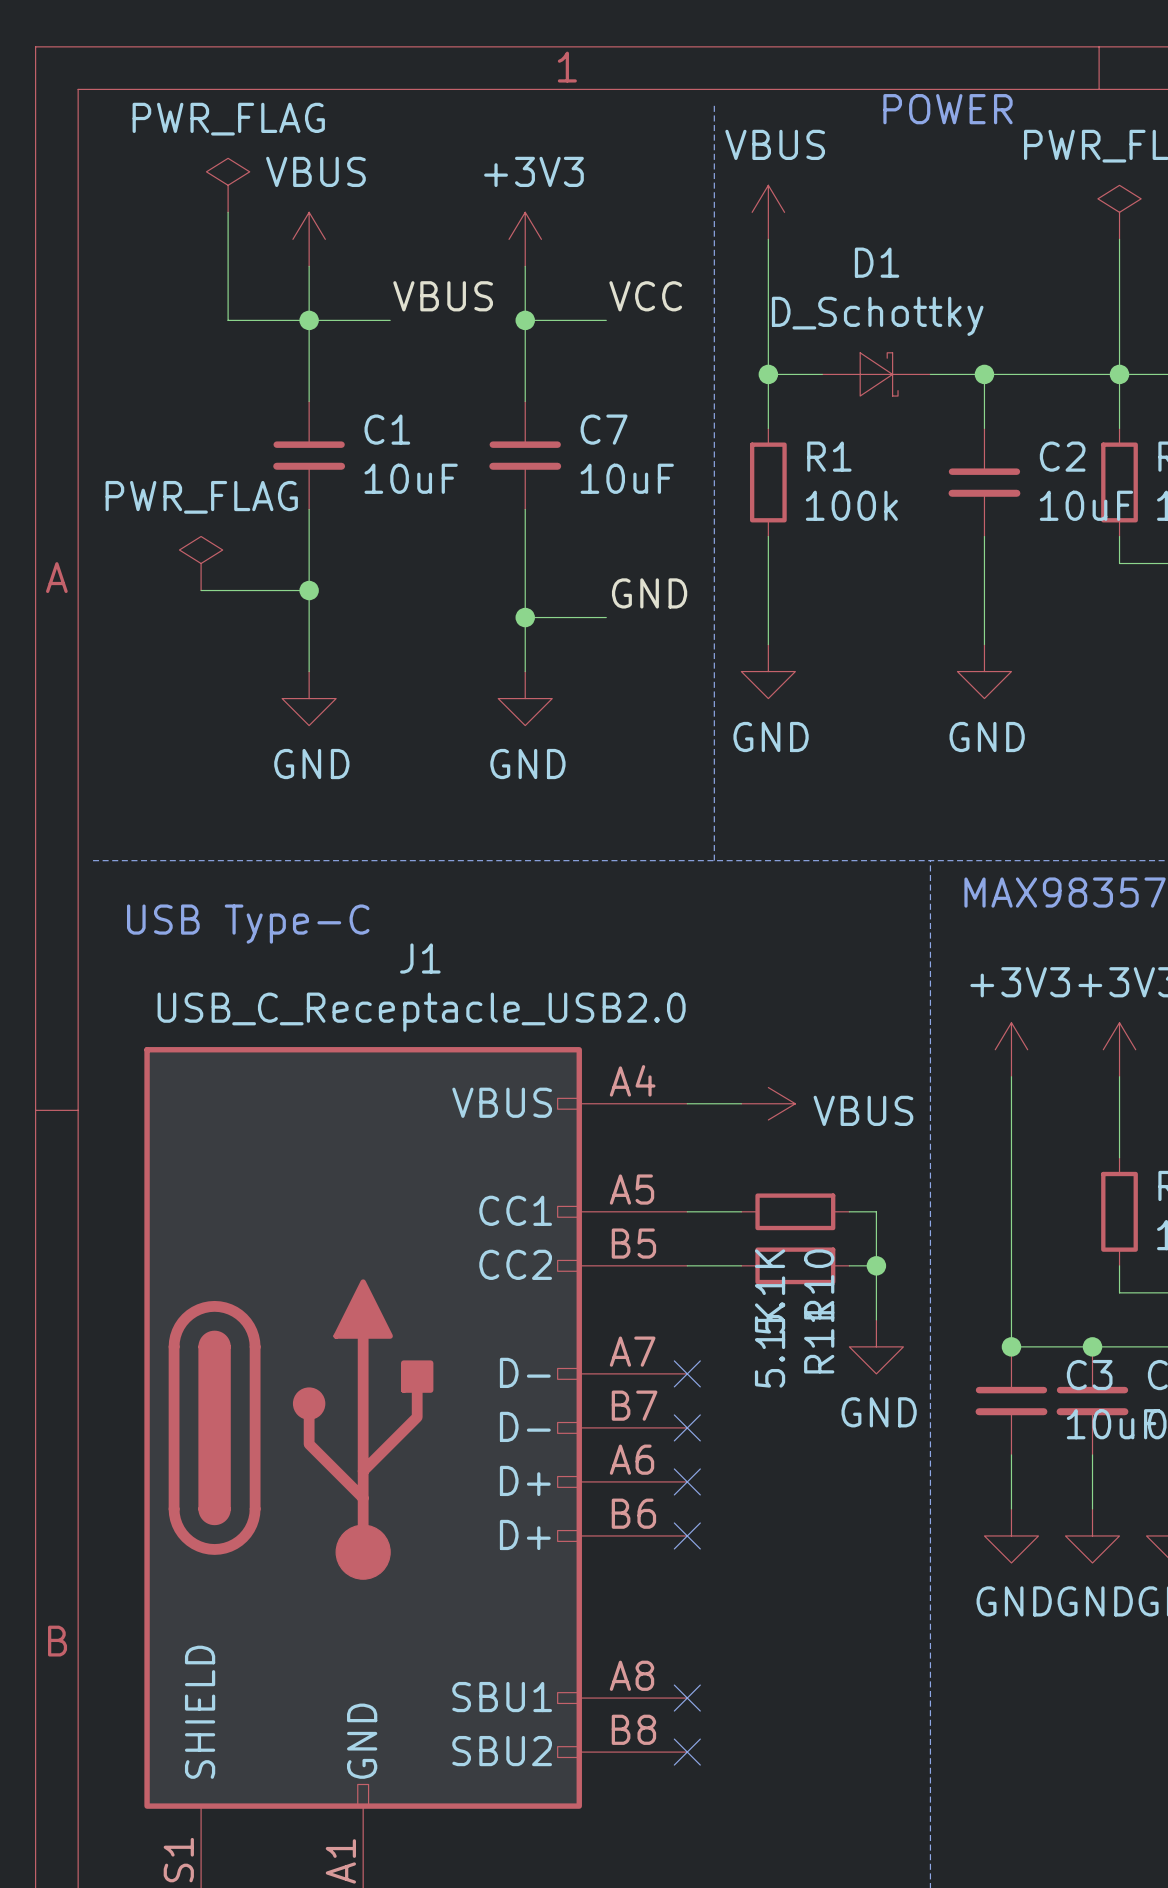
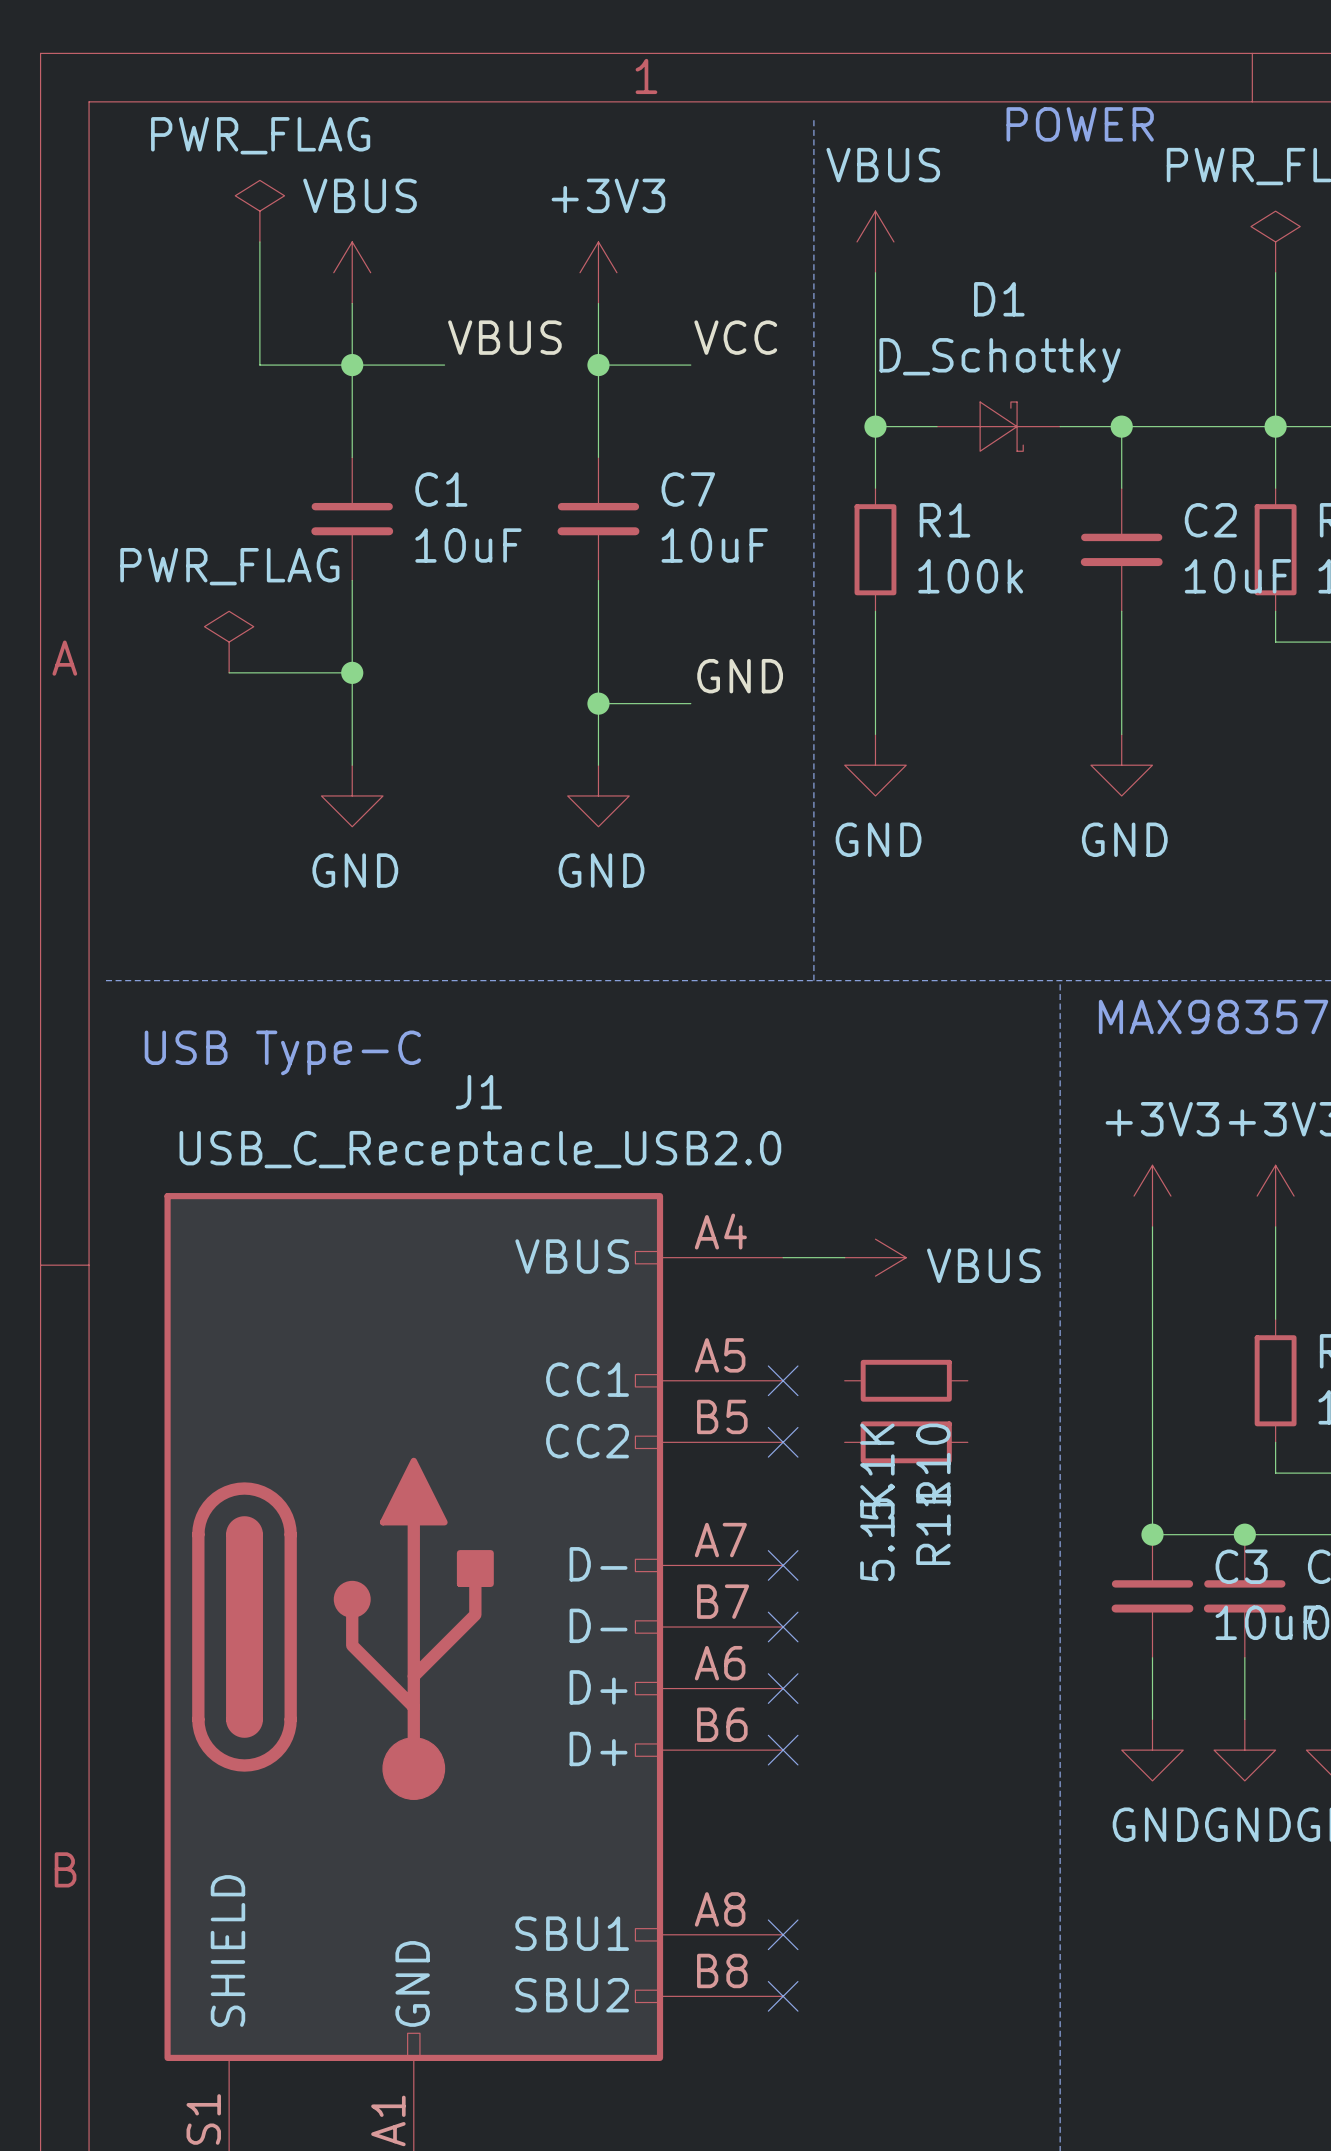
wire: (687, 1211) (741, 1211) -> none
no-connect mark: none -> (783, 1380)
wire: (849, 1211) (876, 1211) (876, 1319) -> none
wire: (687, 1265) (741, 1265) -> none
no-connect mark: none -> (783, 1442)
wire: (849, 1265) (876, 1265) -> none
junction: (876, 1265) -> none
power symbol: GND (876, 1346) -> none

